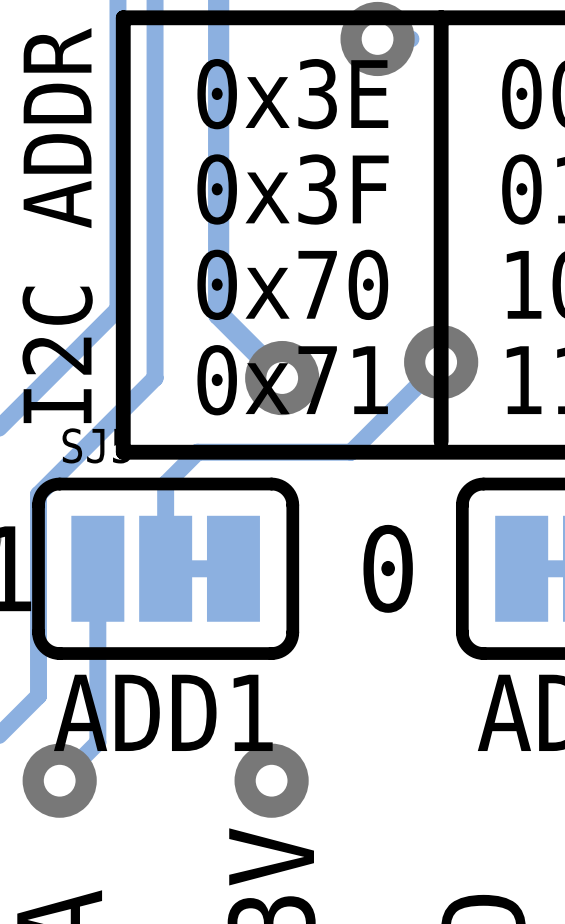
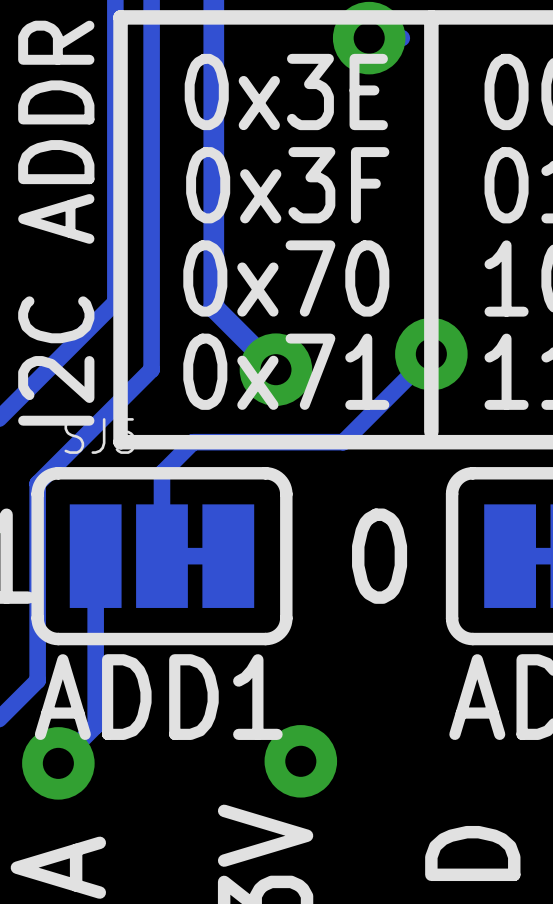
via position: (271, 780) -> (300, 761)

